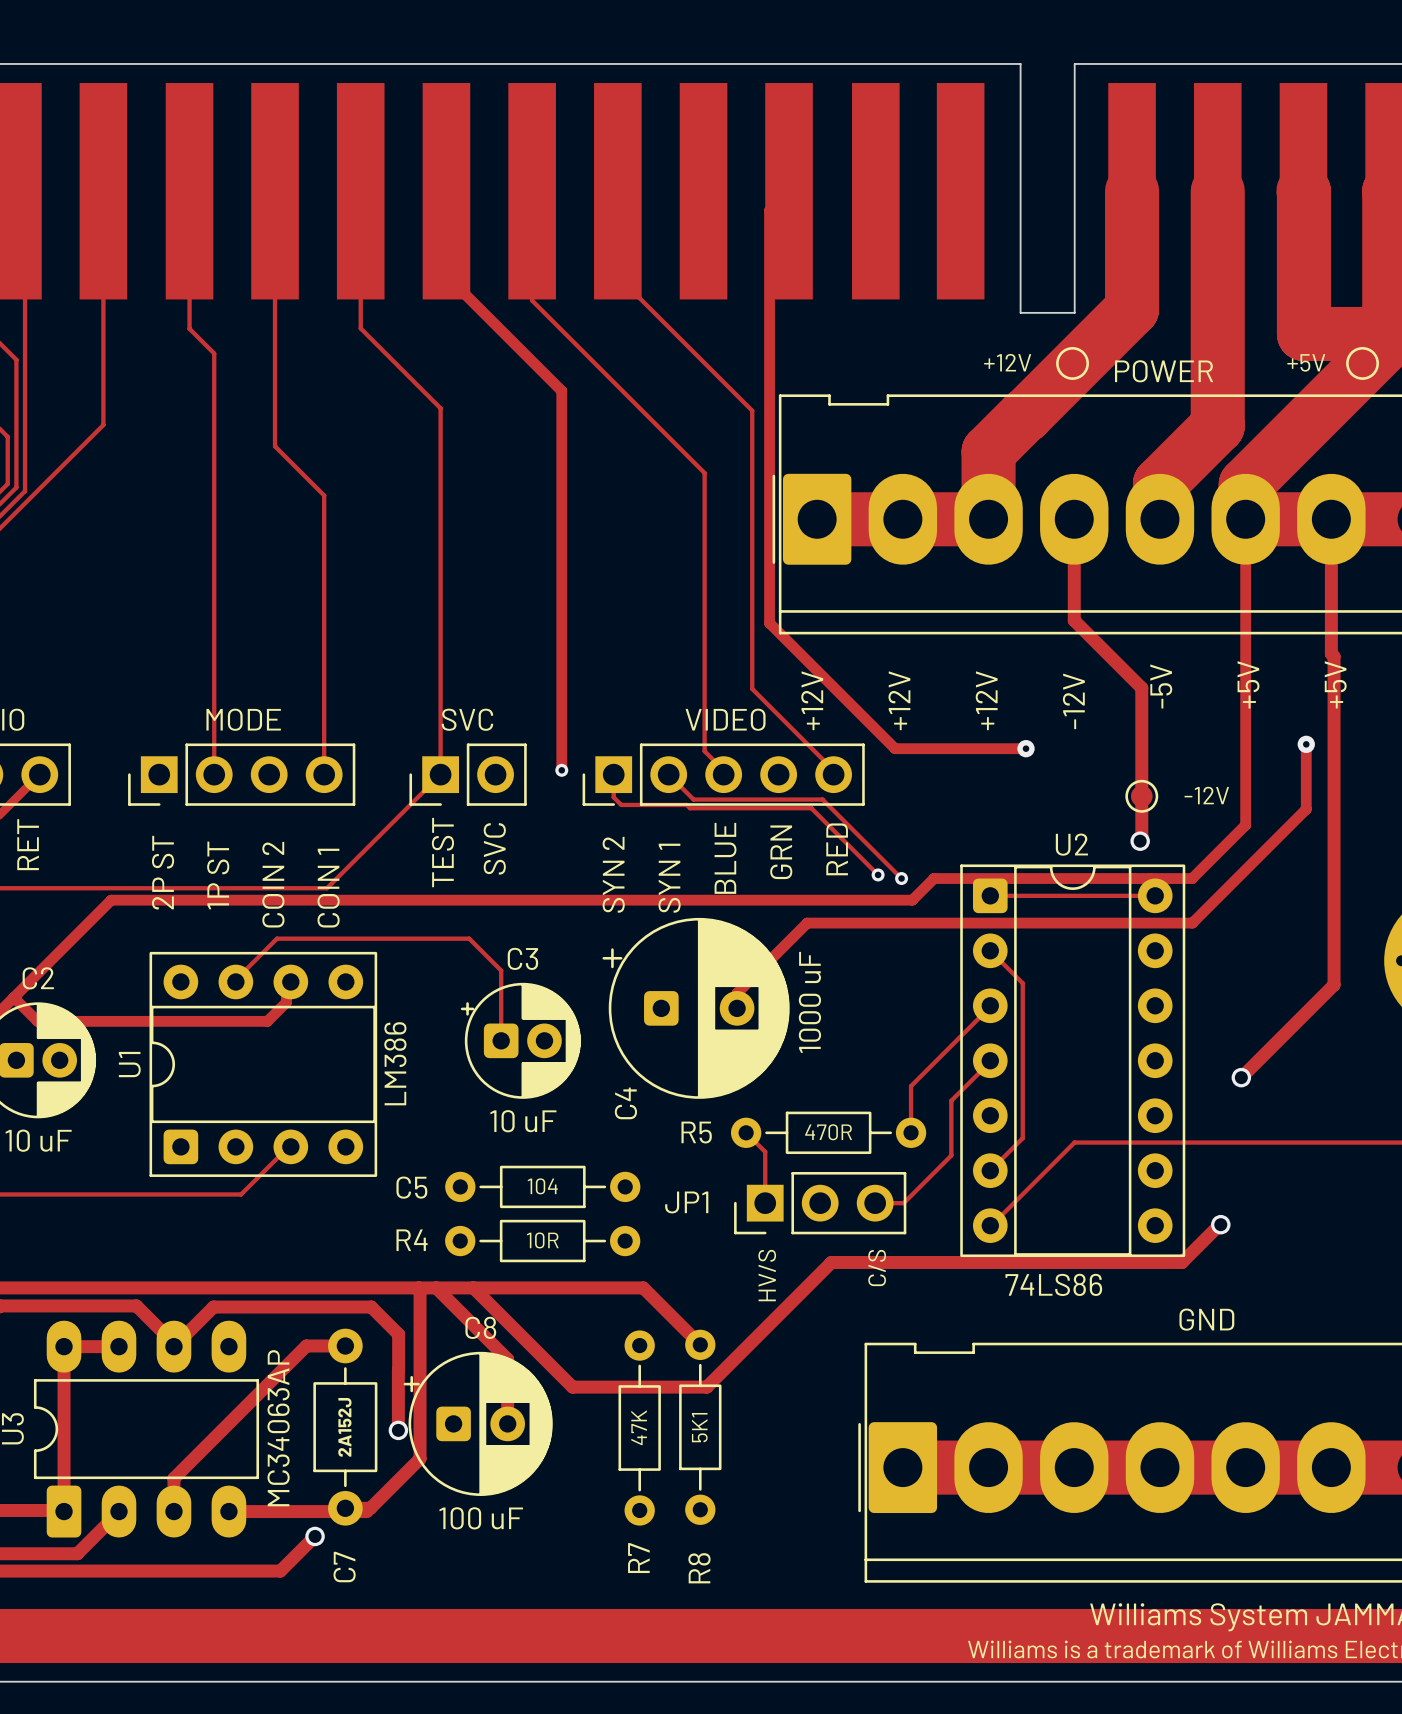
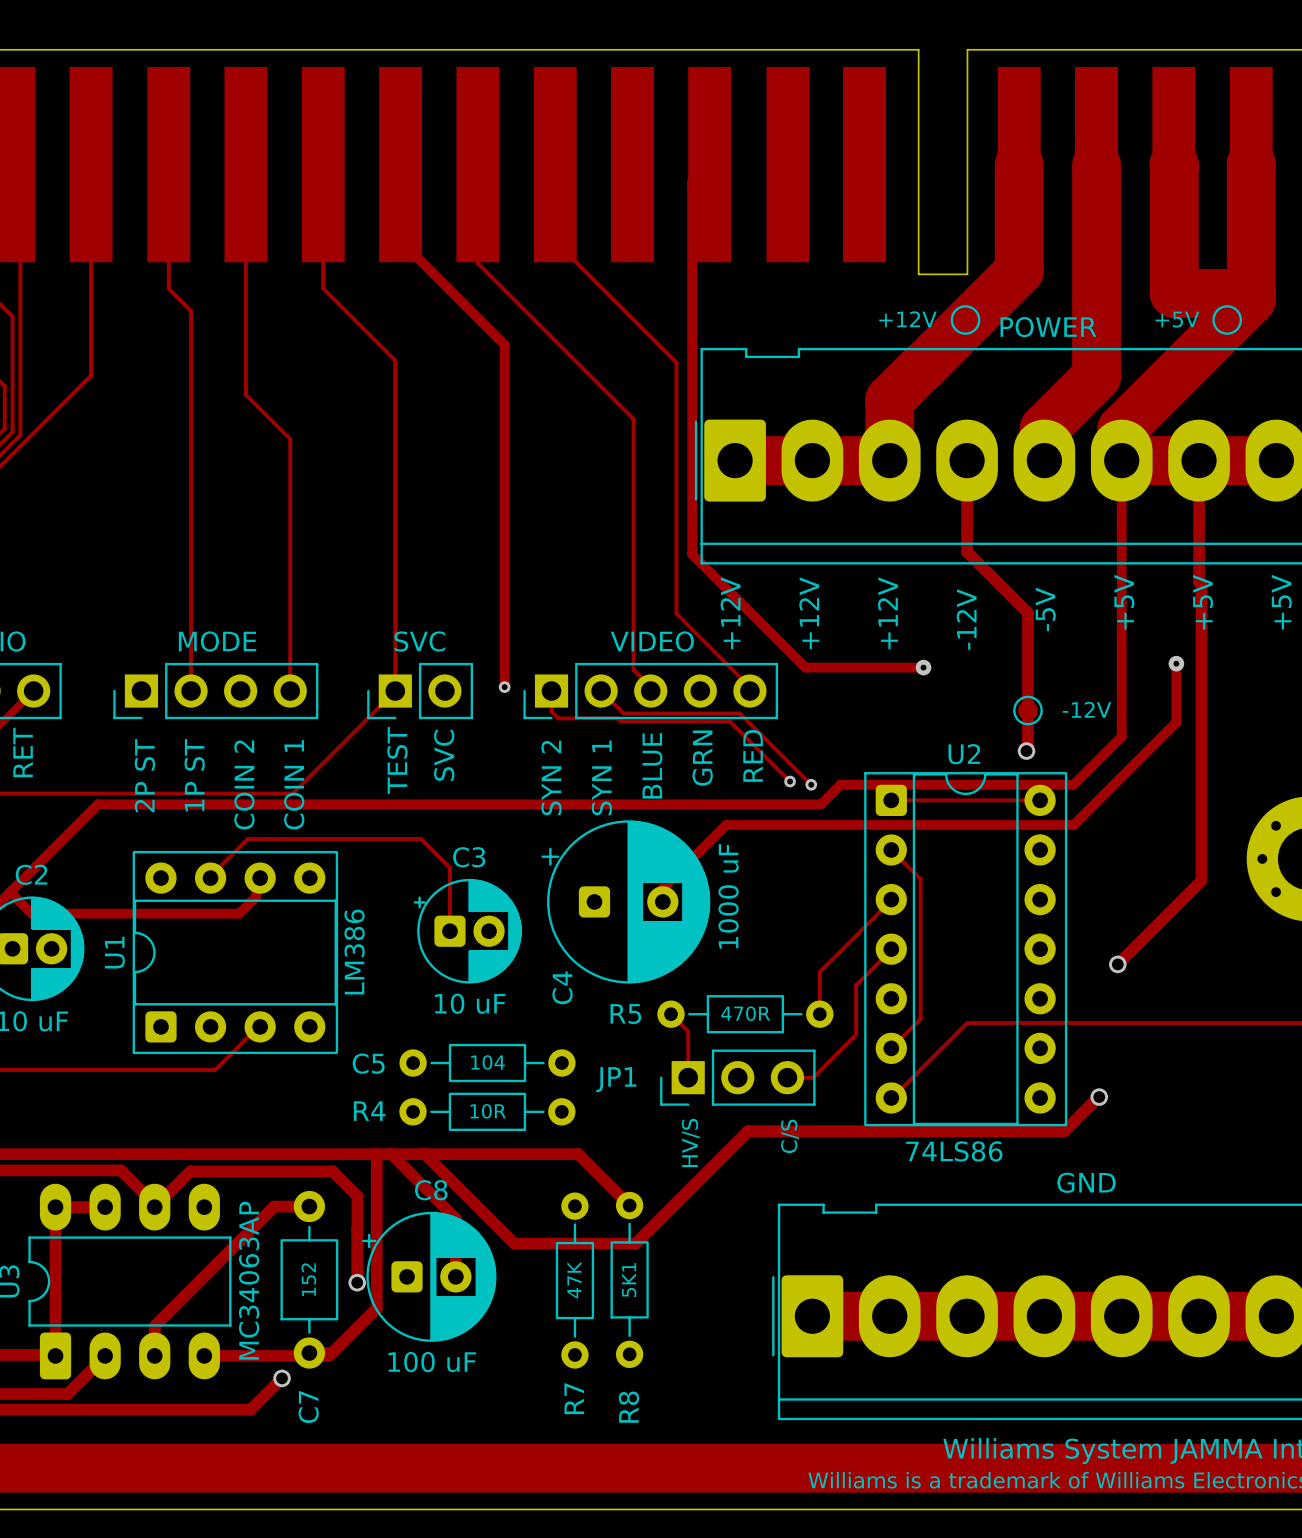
C7 value: 2A152J (344, 1427) -> 152 (308, 1279)

